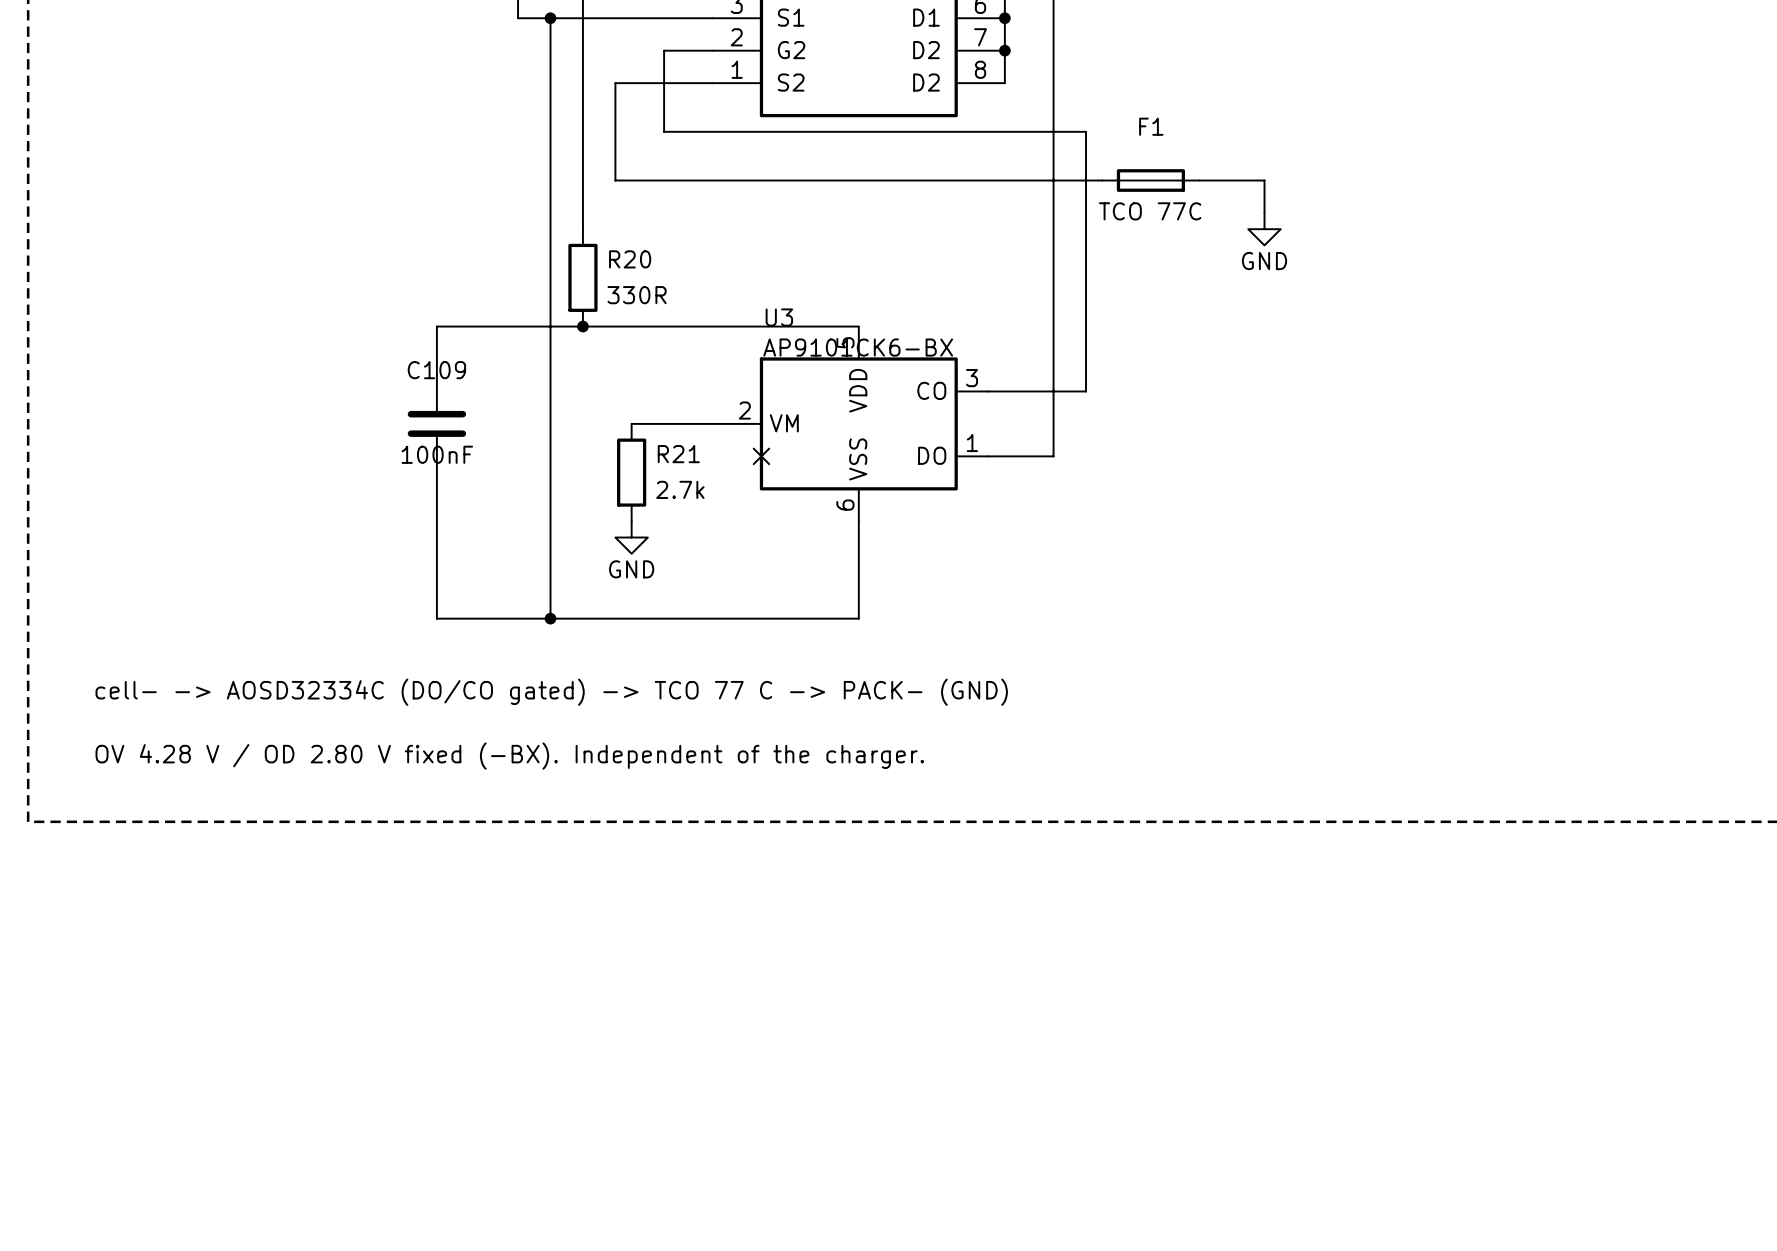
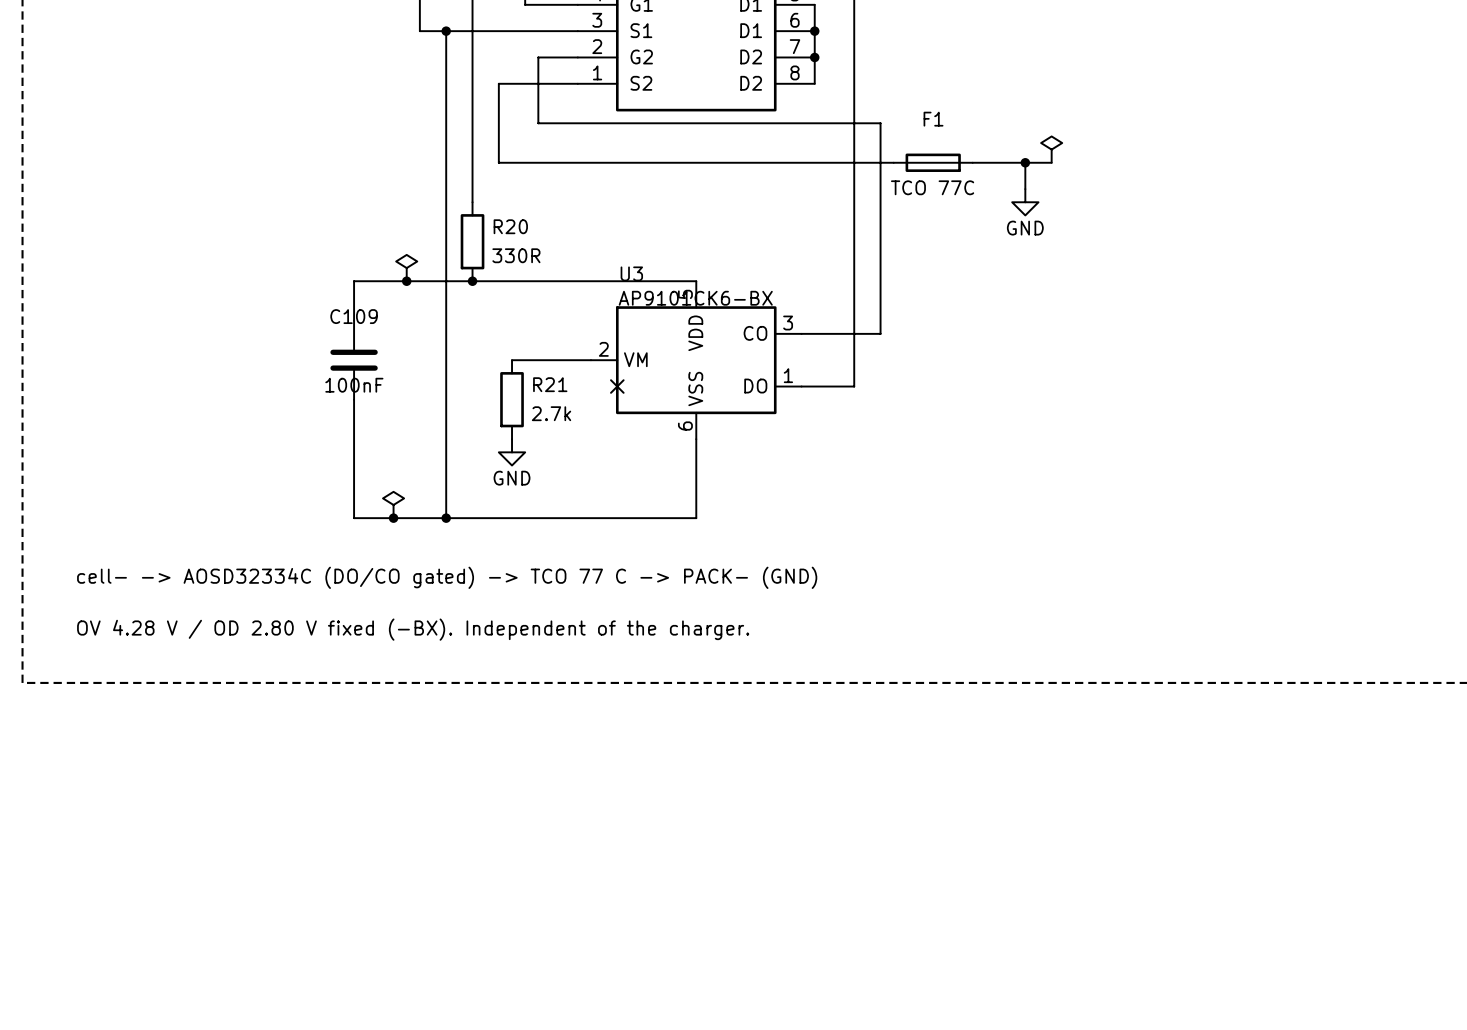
power symbol: none -> (1051, 149)
wire: none -> (1025, 162) (1051, 162)
junction: none -> (1025, 162)
power symbol: none -> (406, 268)
junction: none -> (406, 281)
power symbol: none -> (393, 504)
junction: none -> (393, 518)

